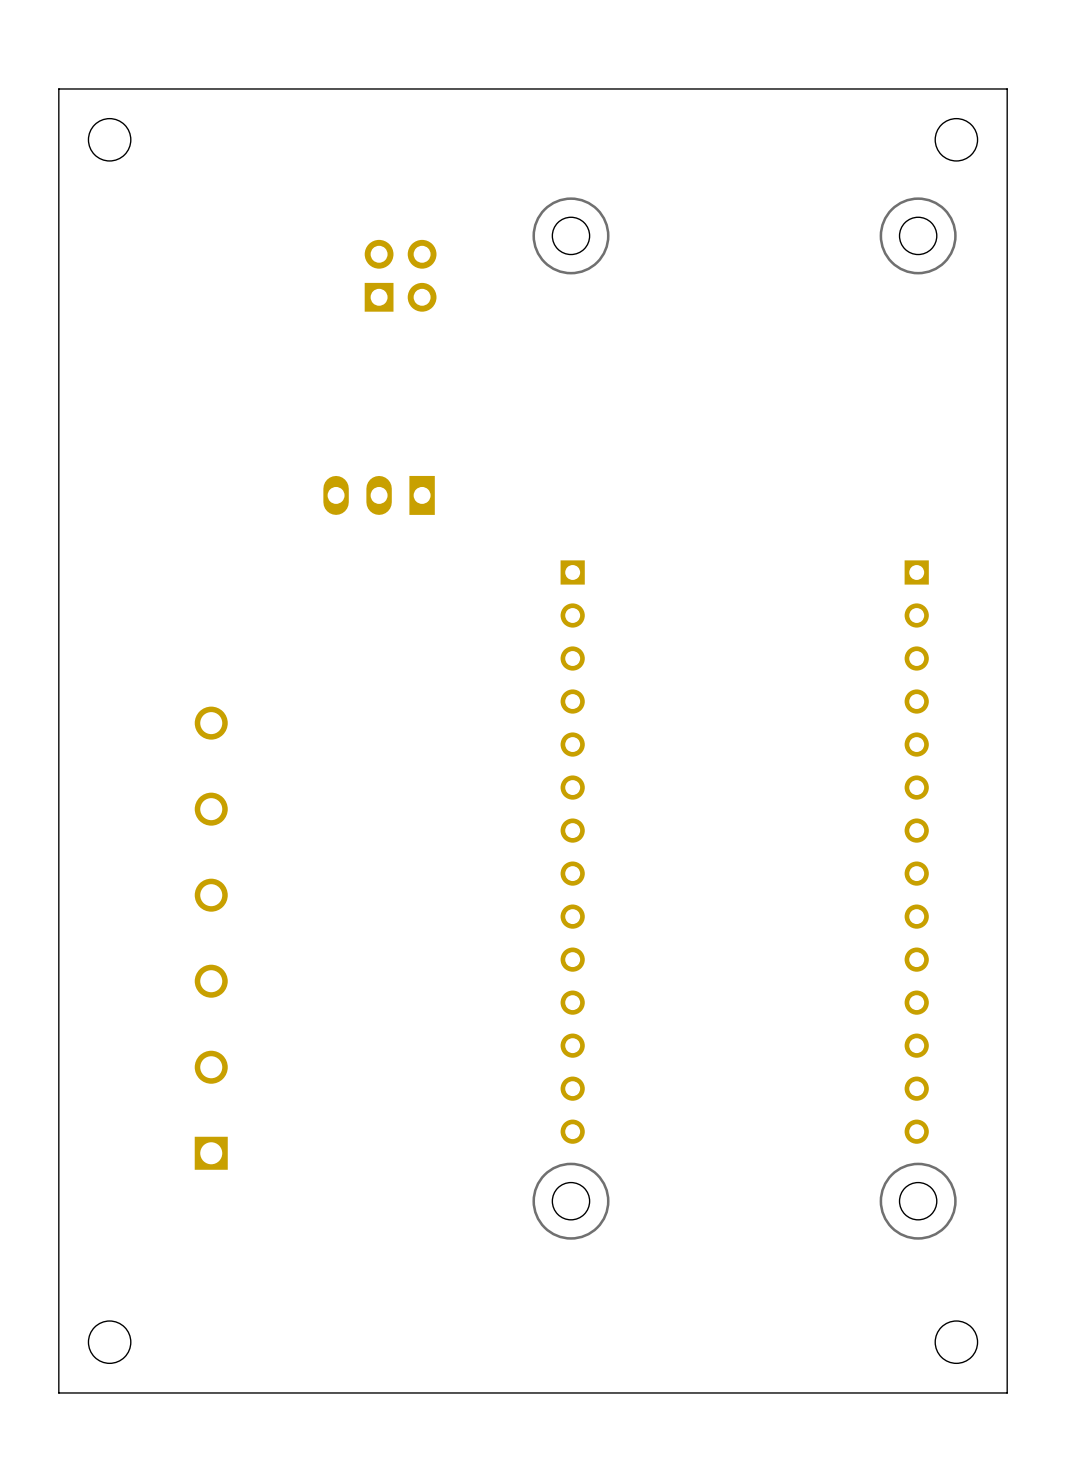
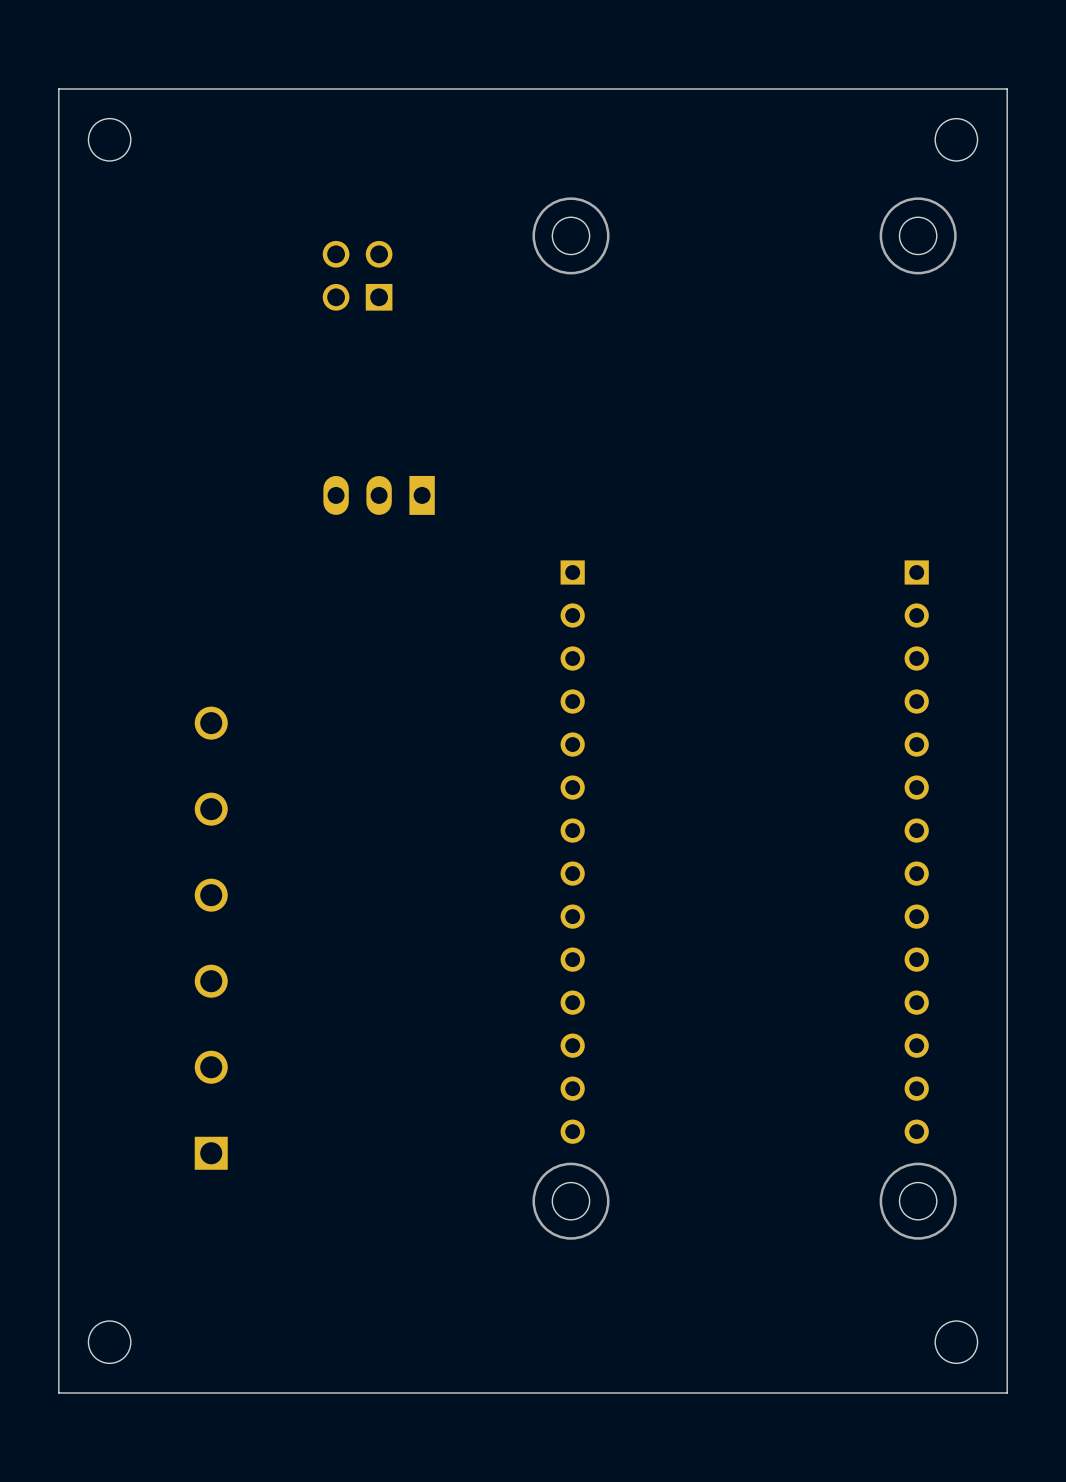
part: none -> (357, 275)
part: (400, 275) -> none

